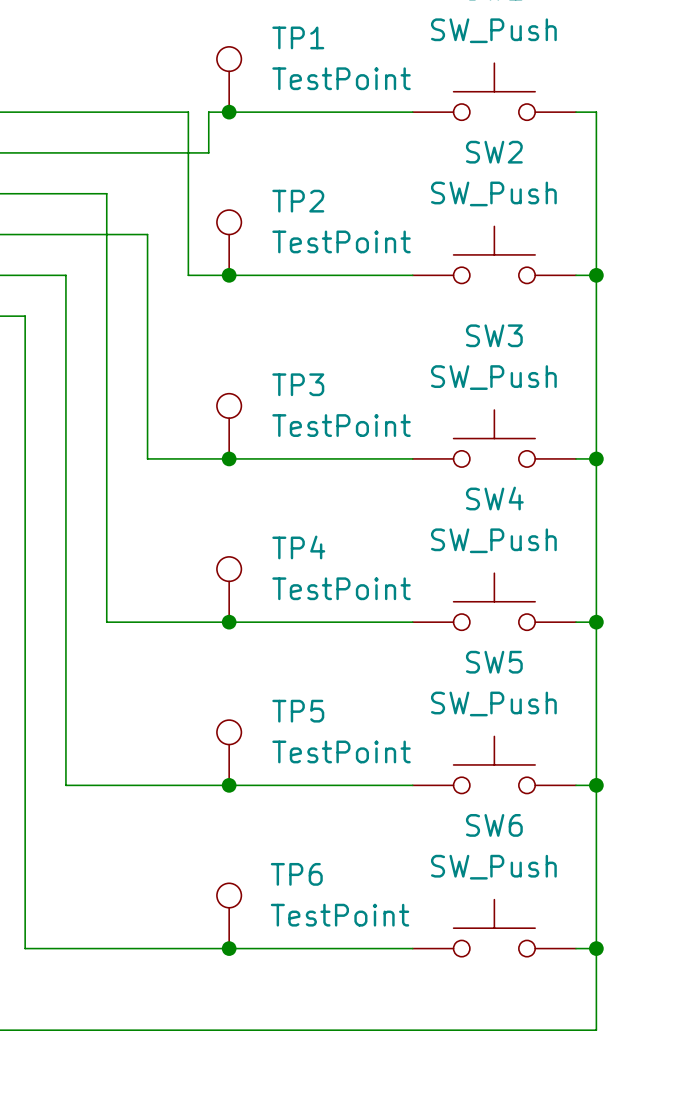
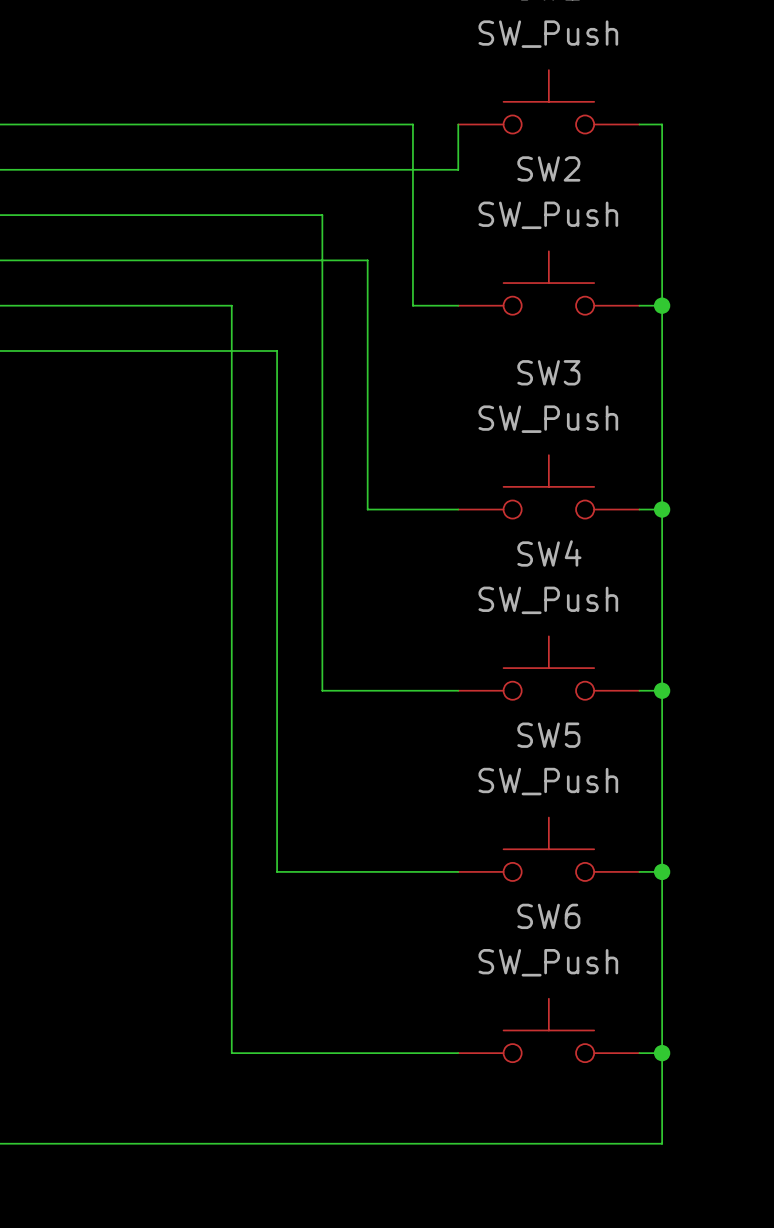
TP1: TestPoint (229, 79) -> none
wire: (188, 112) (188, 275) -> (73, 305) (209, 305)
wire: (208, 112) (208, 152) -> (231, 124) (209, 124)
junction: (229, 112) -> none
wire: (371, 112) (412, 112) -> (412, 124) (412, 305)
wire: none -> (458, 124) (458, 169) (231, 169)
wire: (106, 193) (106, 622) (290, 622) -> (118, 215) (322, 215) (322, 690)
wire: (147, 234) (147, 458) (331, 458) -> (163, 260) (367, 260) (367, 509)
TP2: TestPoint (229, 242) -> none
wire: (65, 275) (65, 785) (249, 785) -> (27, 350) (277, 350) (277, 871)
wire: (208, 275) (371, 275) -> none
junction: (229, 275) -> none
wire: (25, 316) (25, 948) (208, 948) -> (231, 305) (231, 1053)
TP3: TestPoint (229, 426) -> none
junction: (229, 458) -> none
TP4: TestPoint (229, 589) -> none
junction: (229, 622) -> none
TP5: TestPoint (229, 752) -> none
junction: (229, 785) -> none
TP6: TestPoint (229, 915) -> none
junction: (229, 948) -> none

